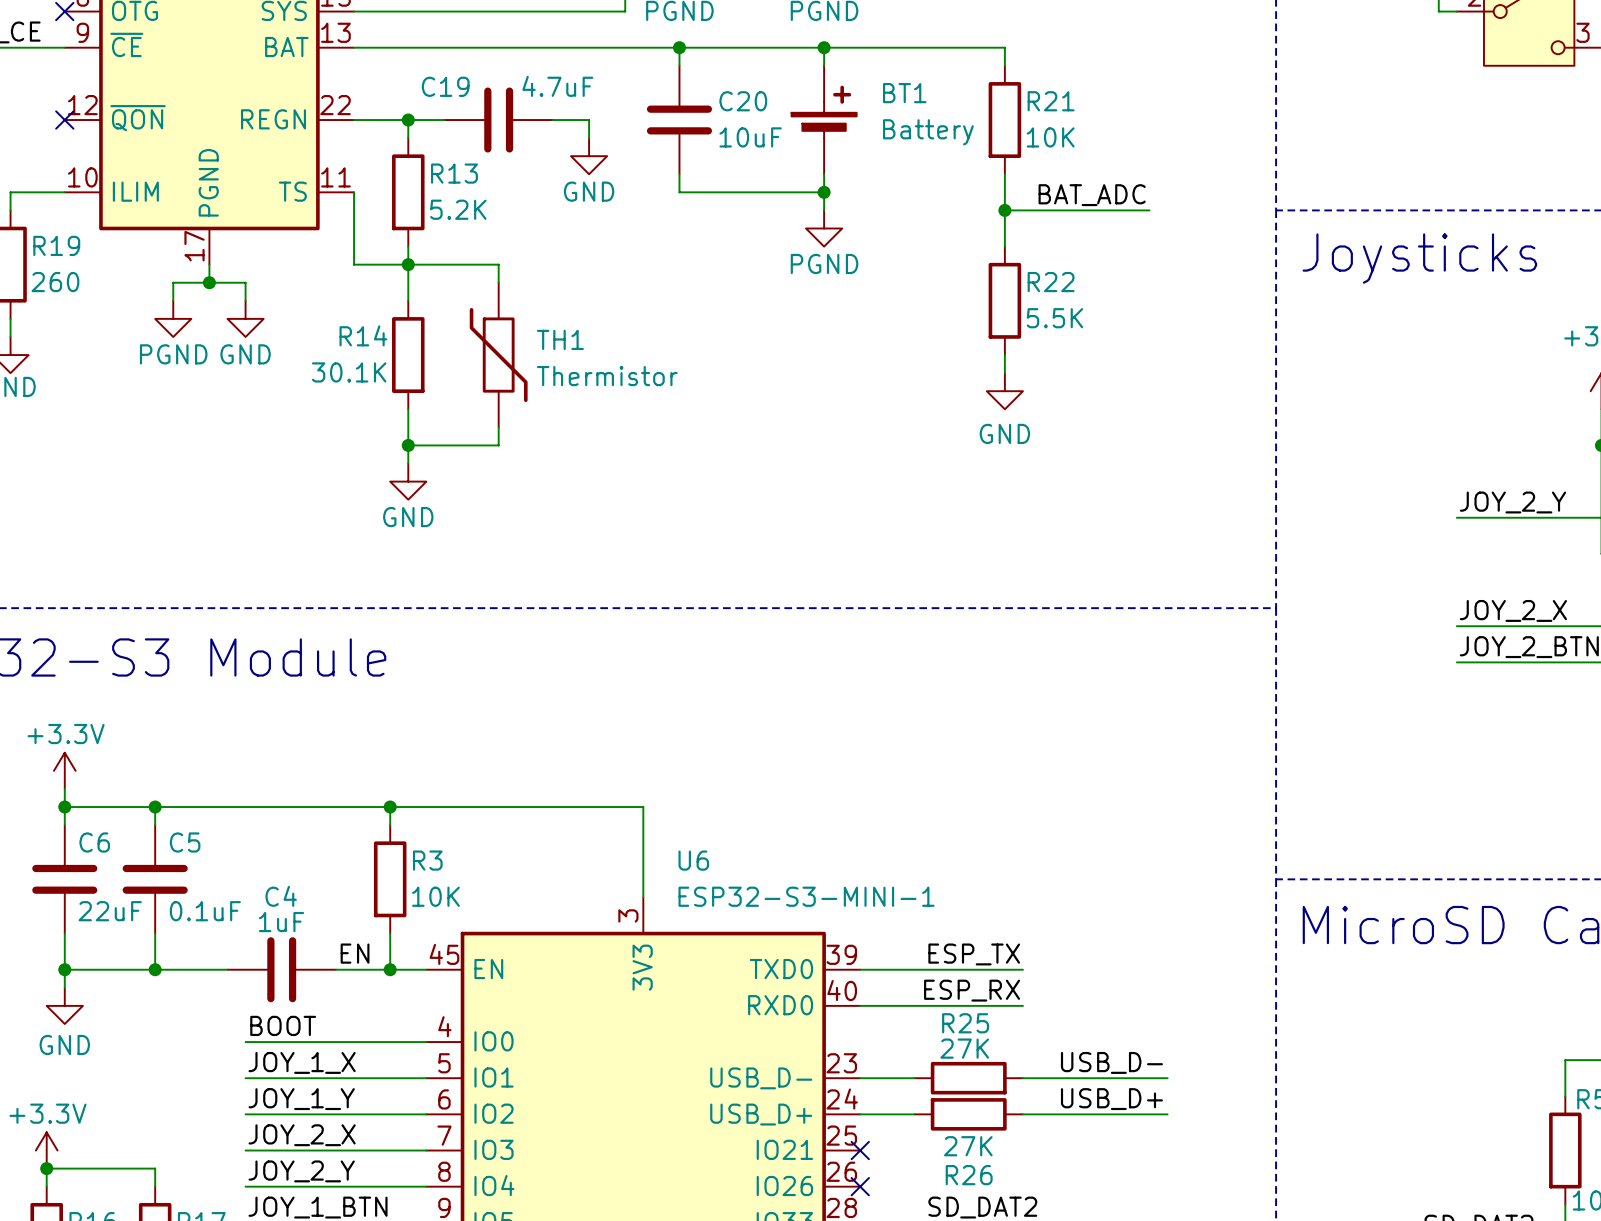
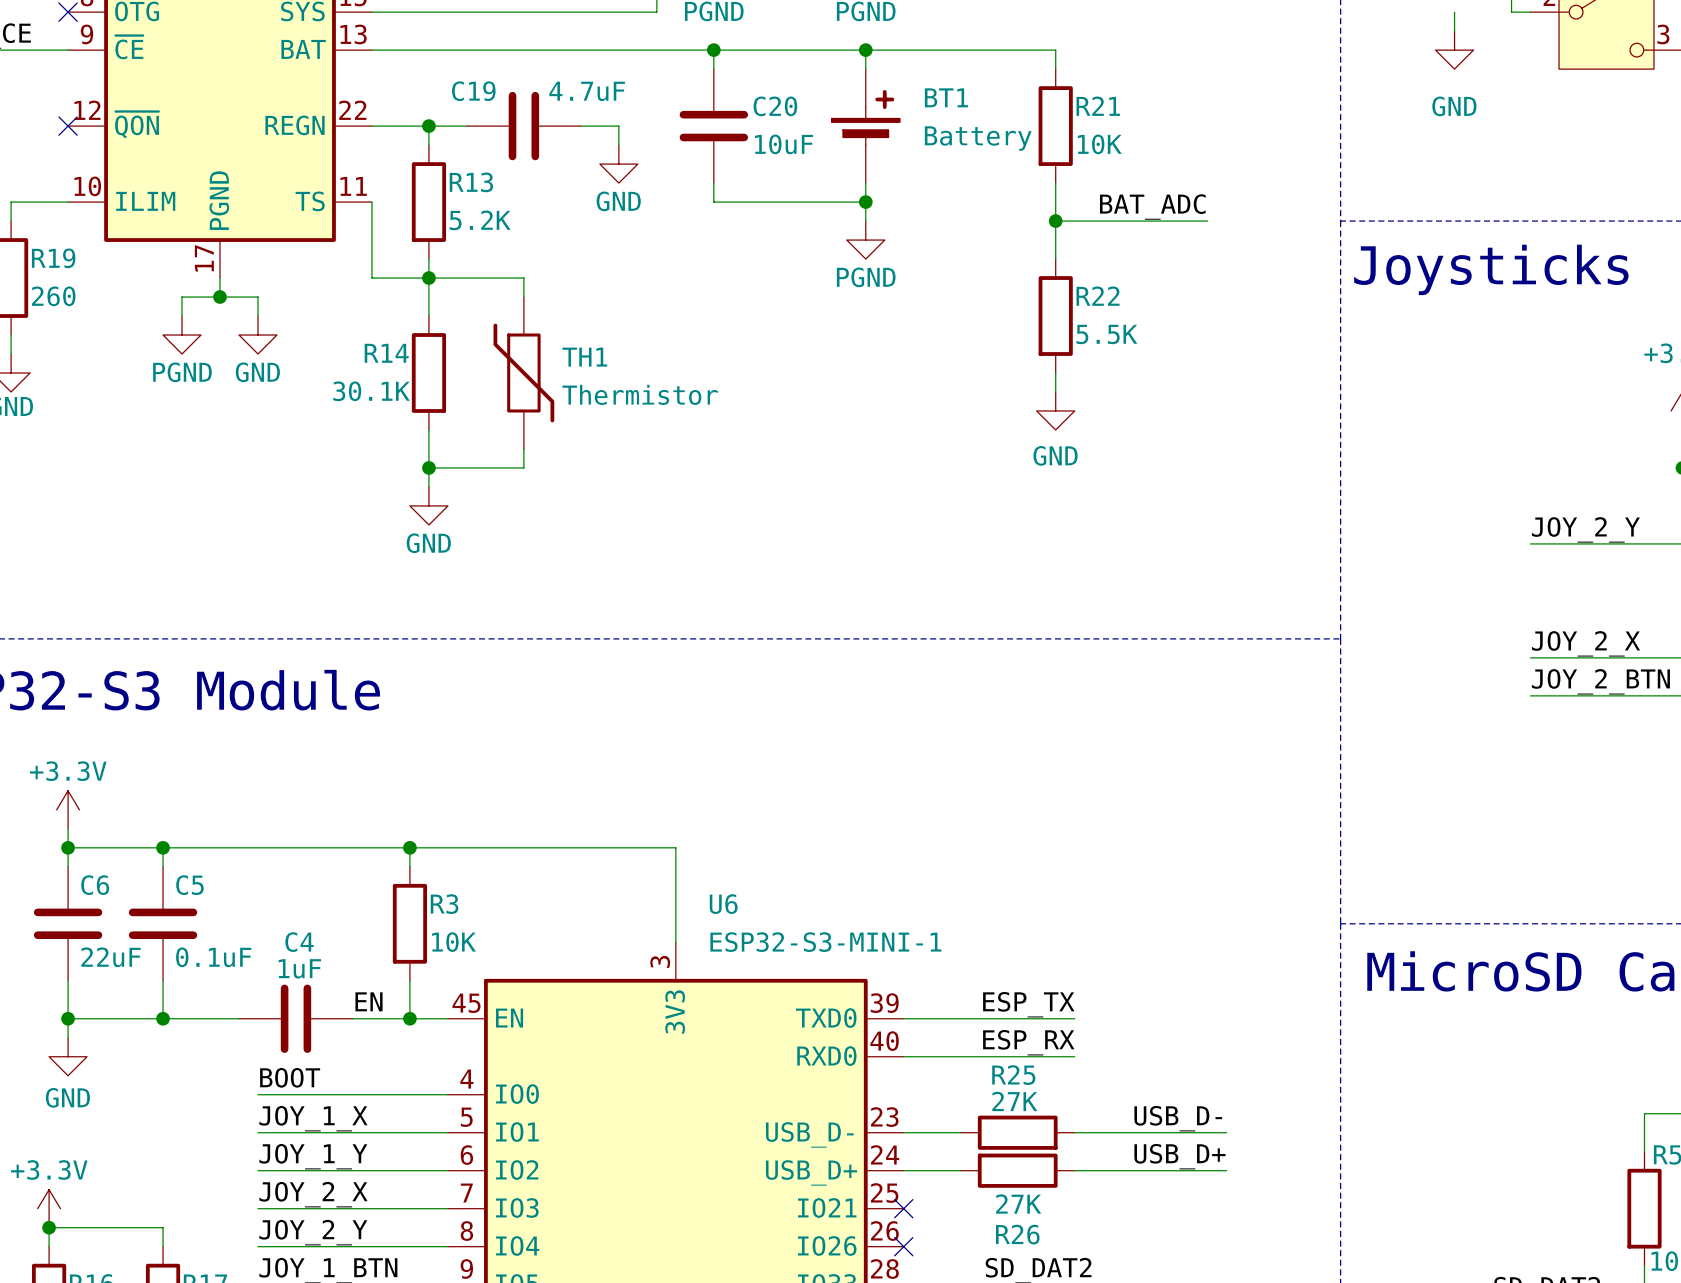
wire: none -> (1454, 12) (1454, 31)
power symbol: none -> GND (1454, 50)

